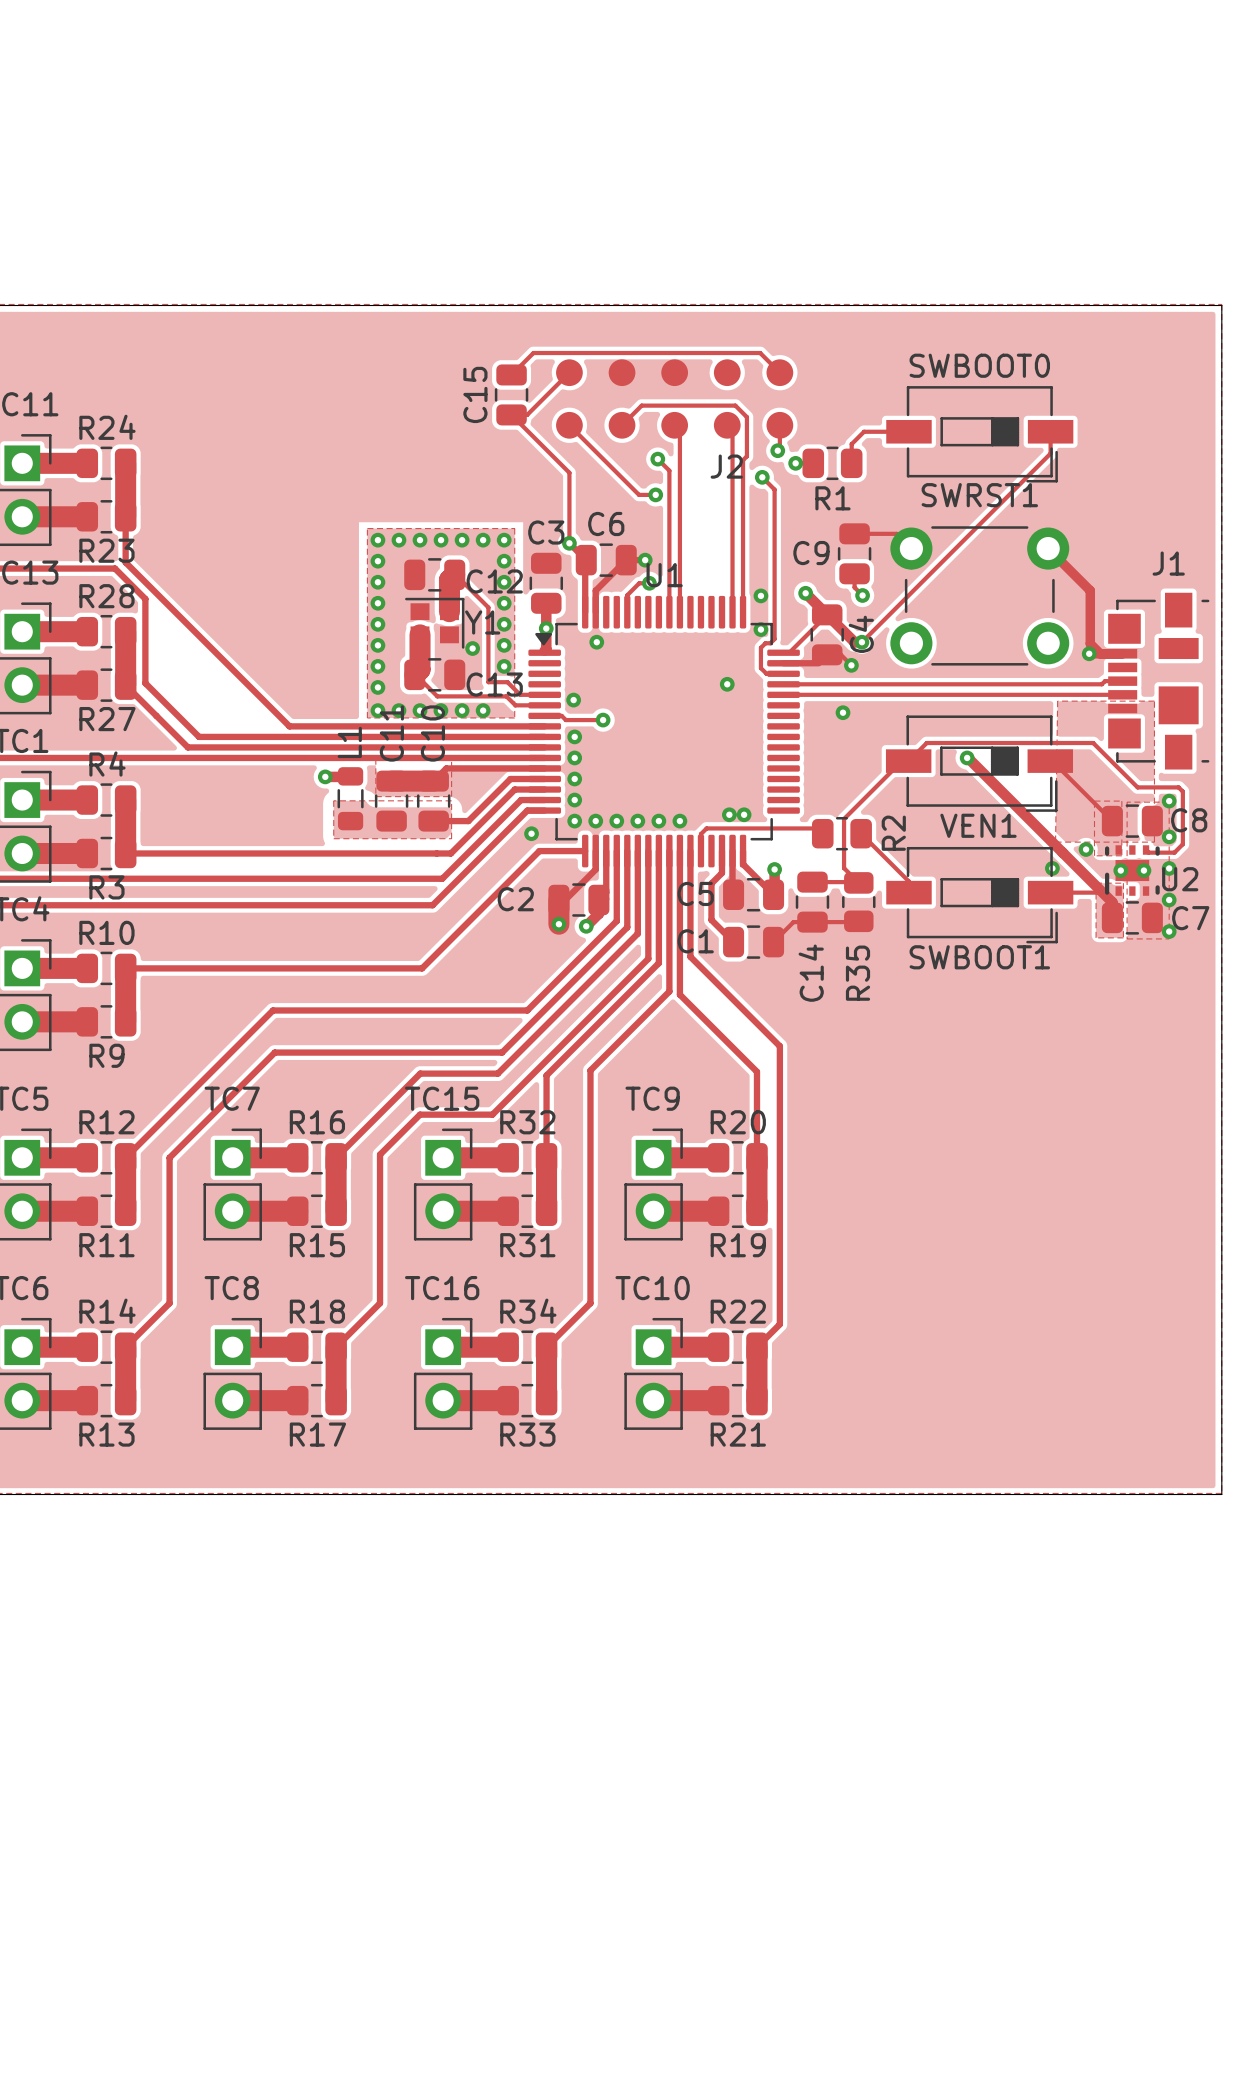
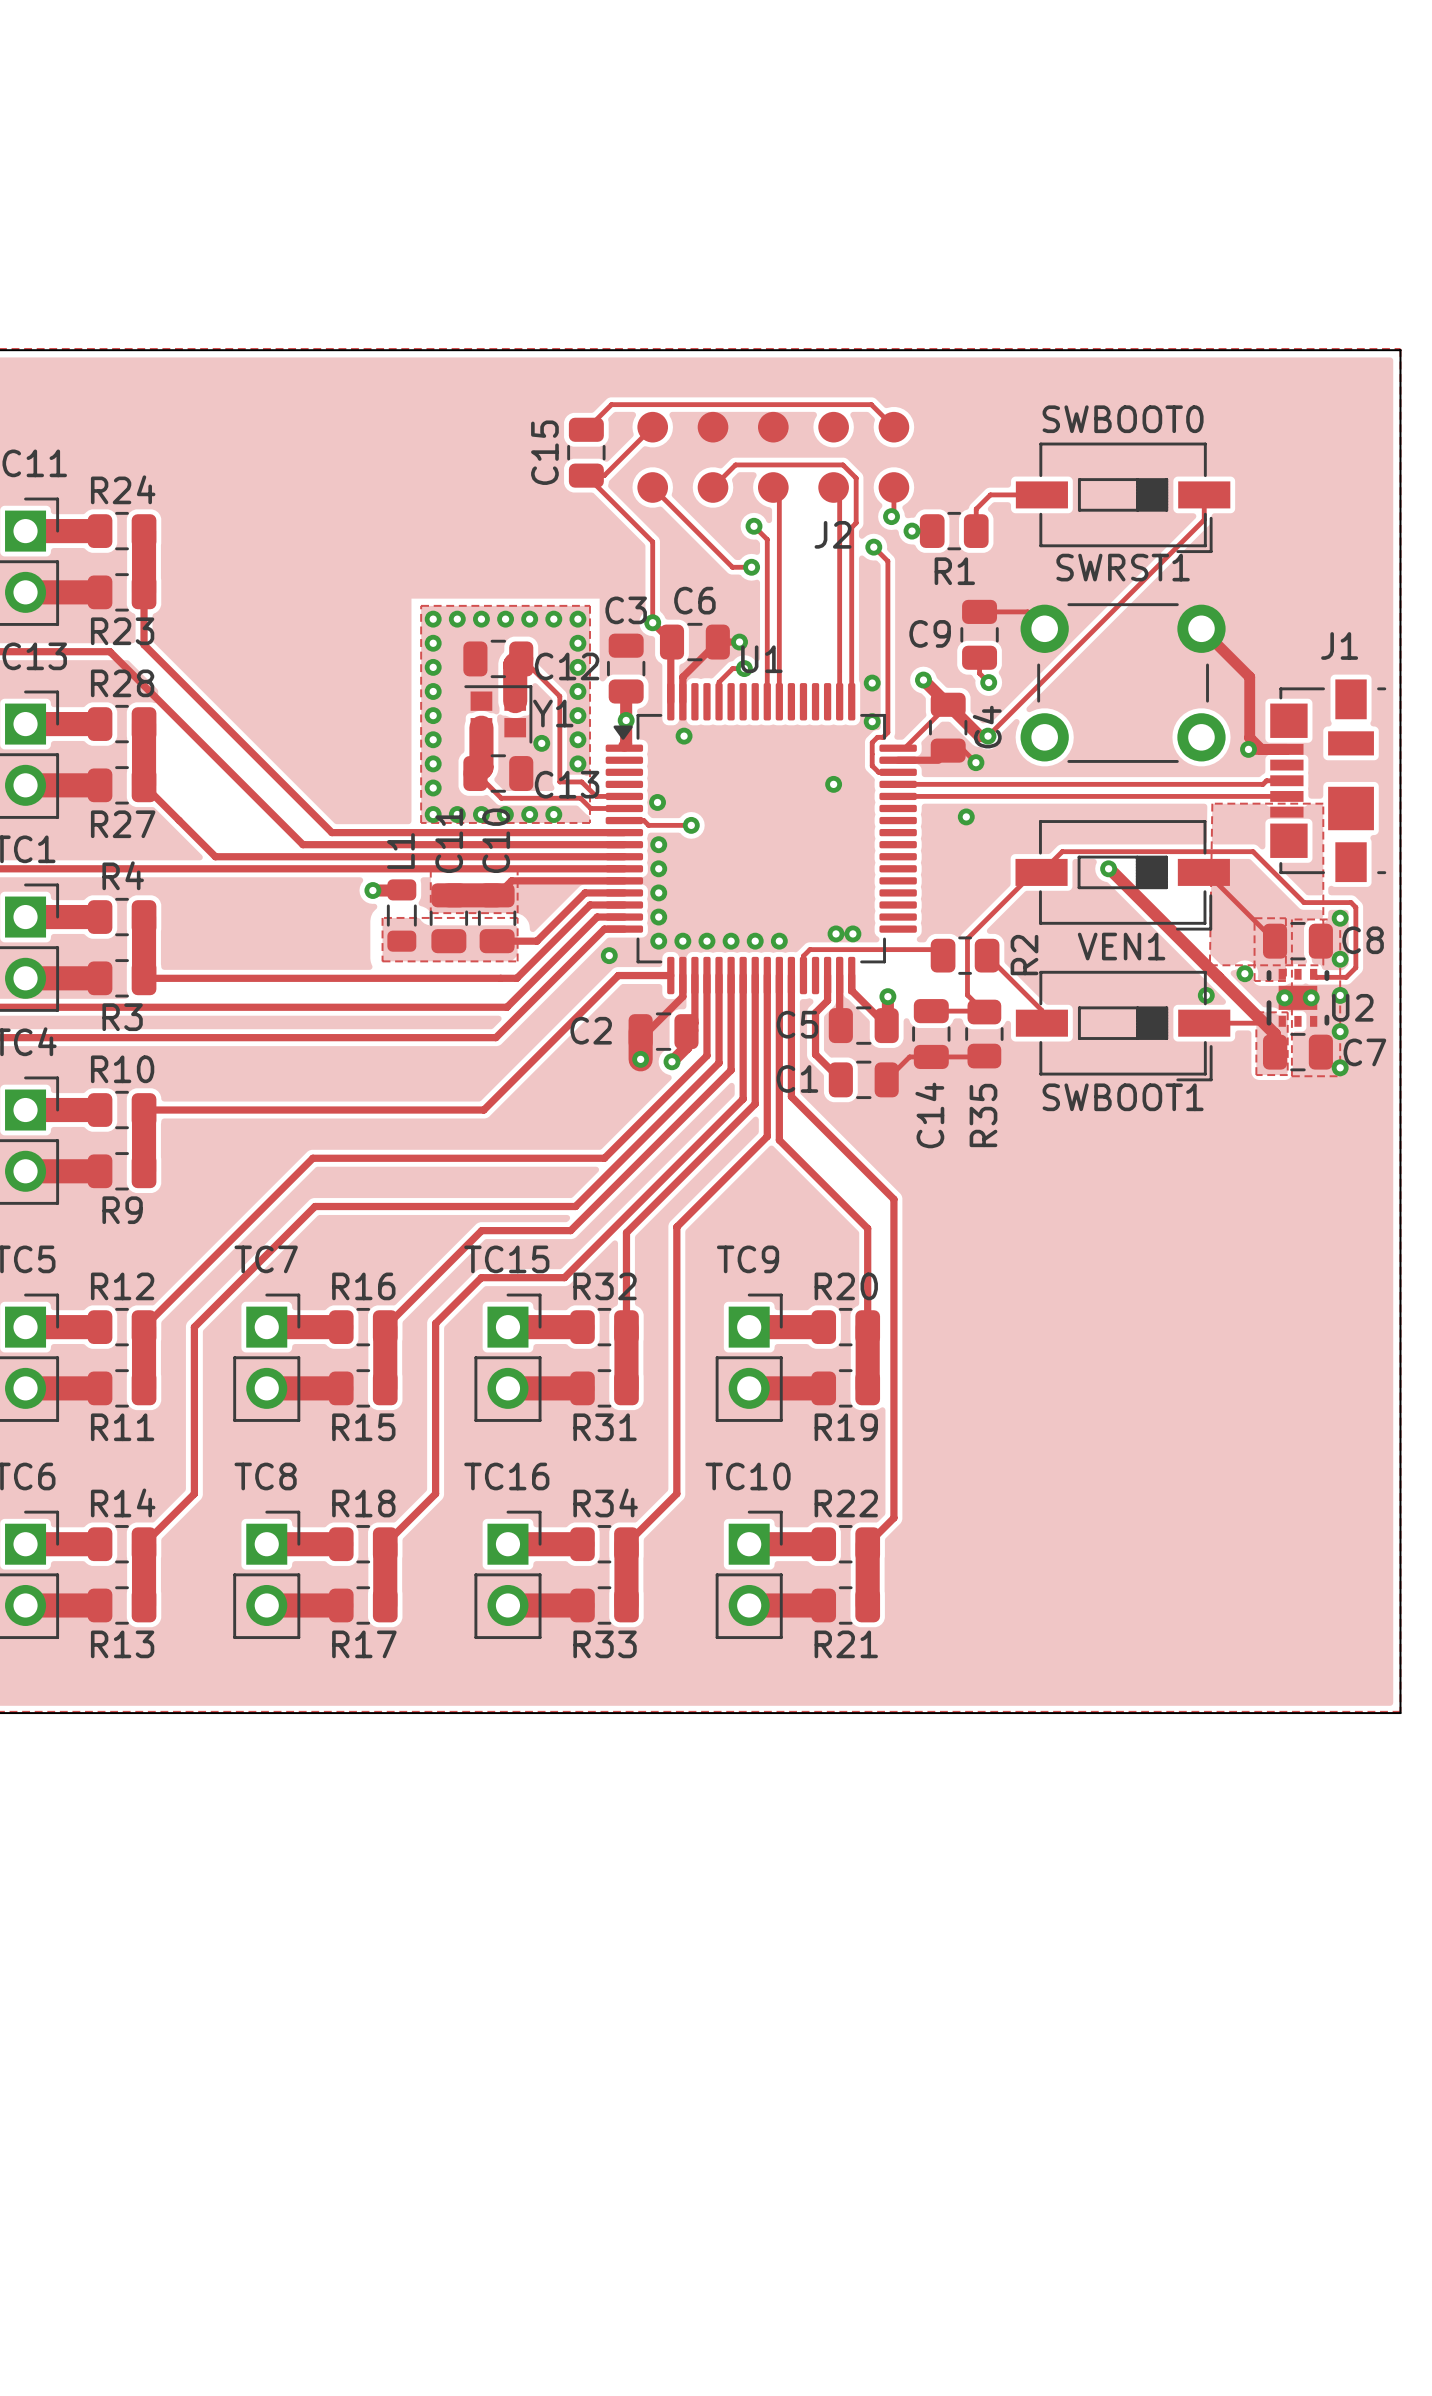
track: (95, 568) (114, 568) (145, 598) (145, 683) (199, 736) (264, 736) -> (109, 651) (302, 844)

